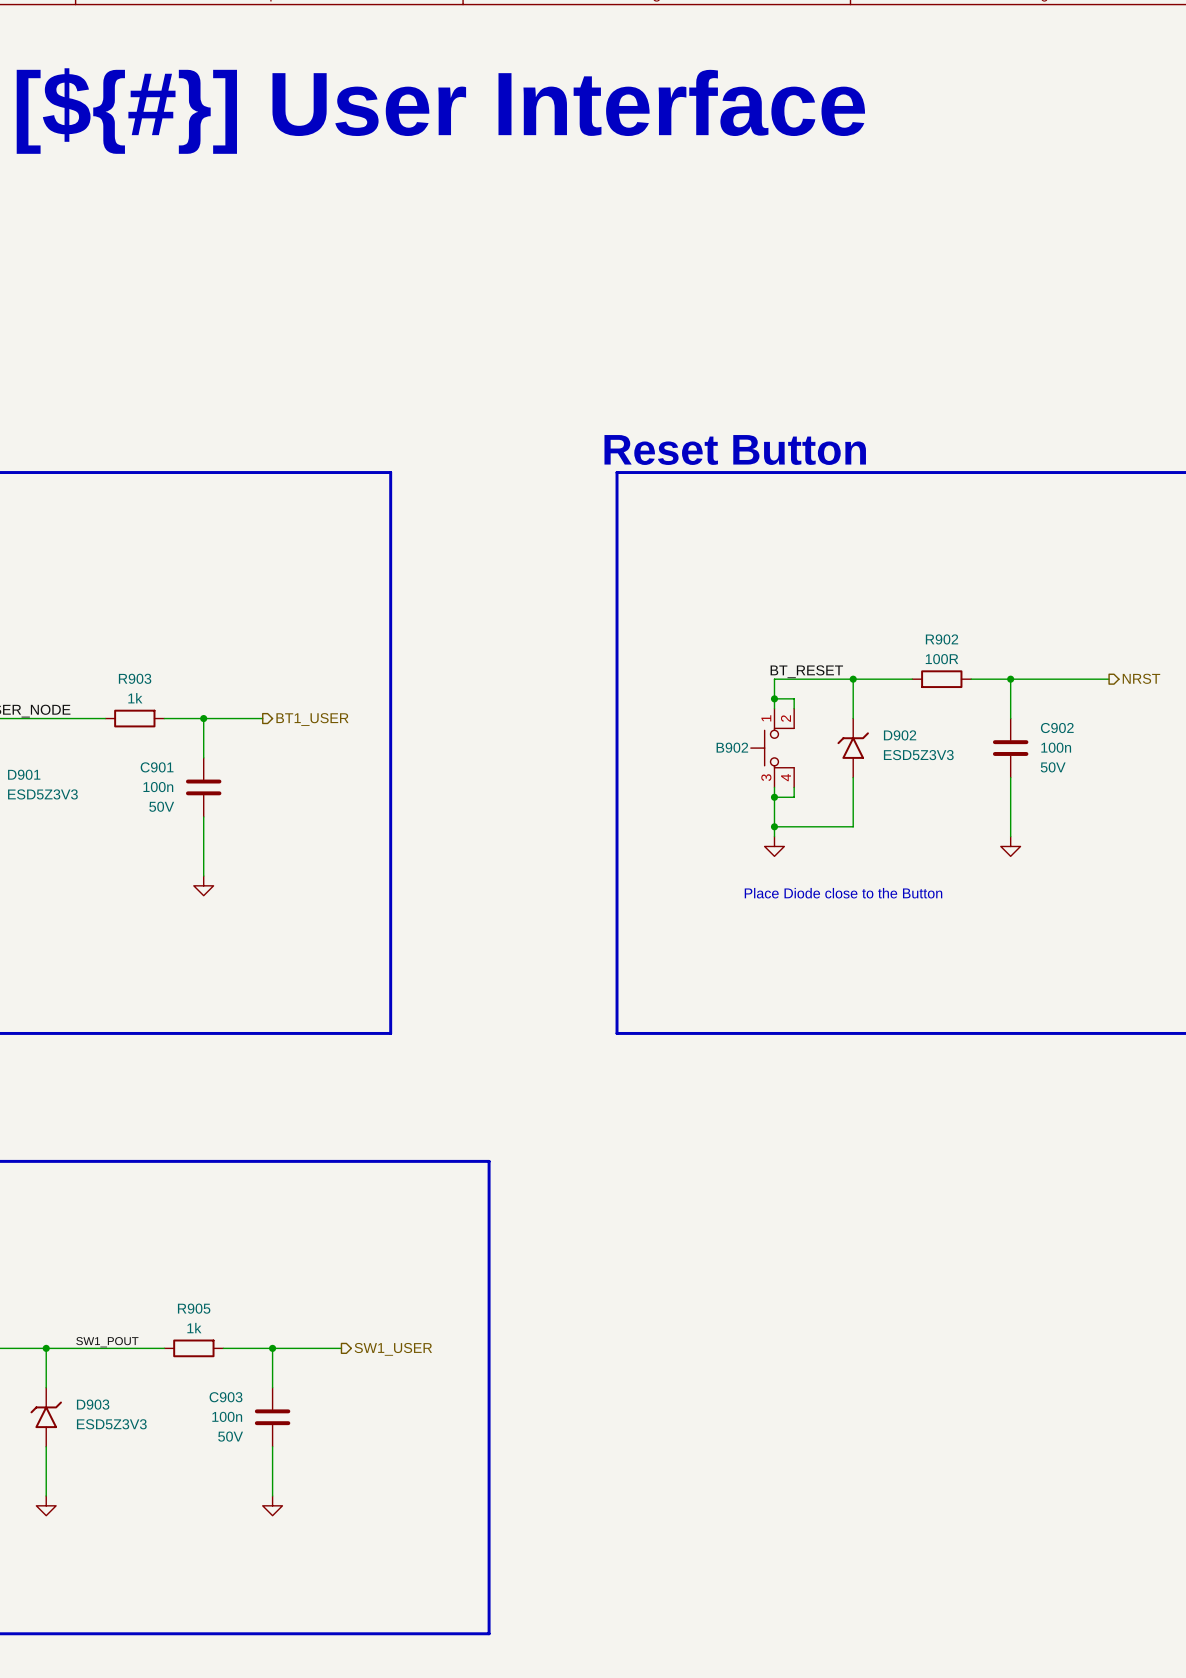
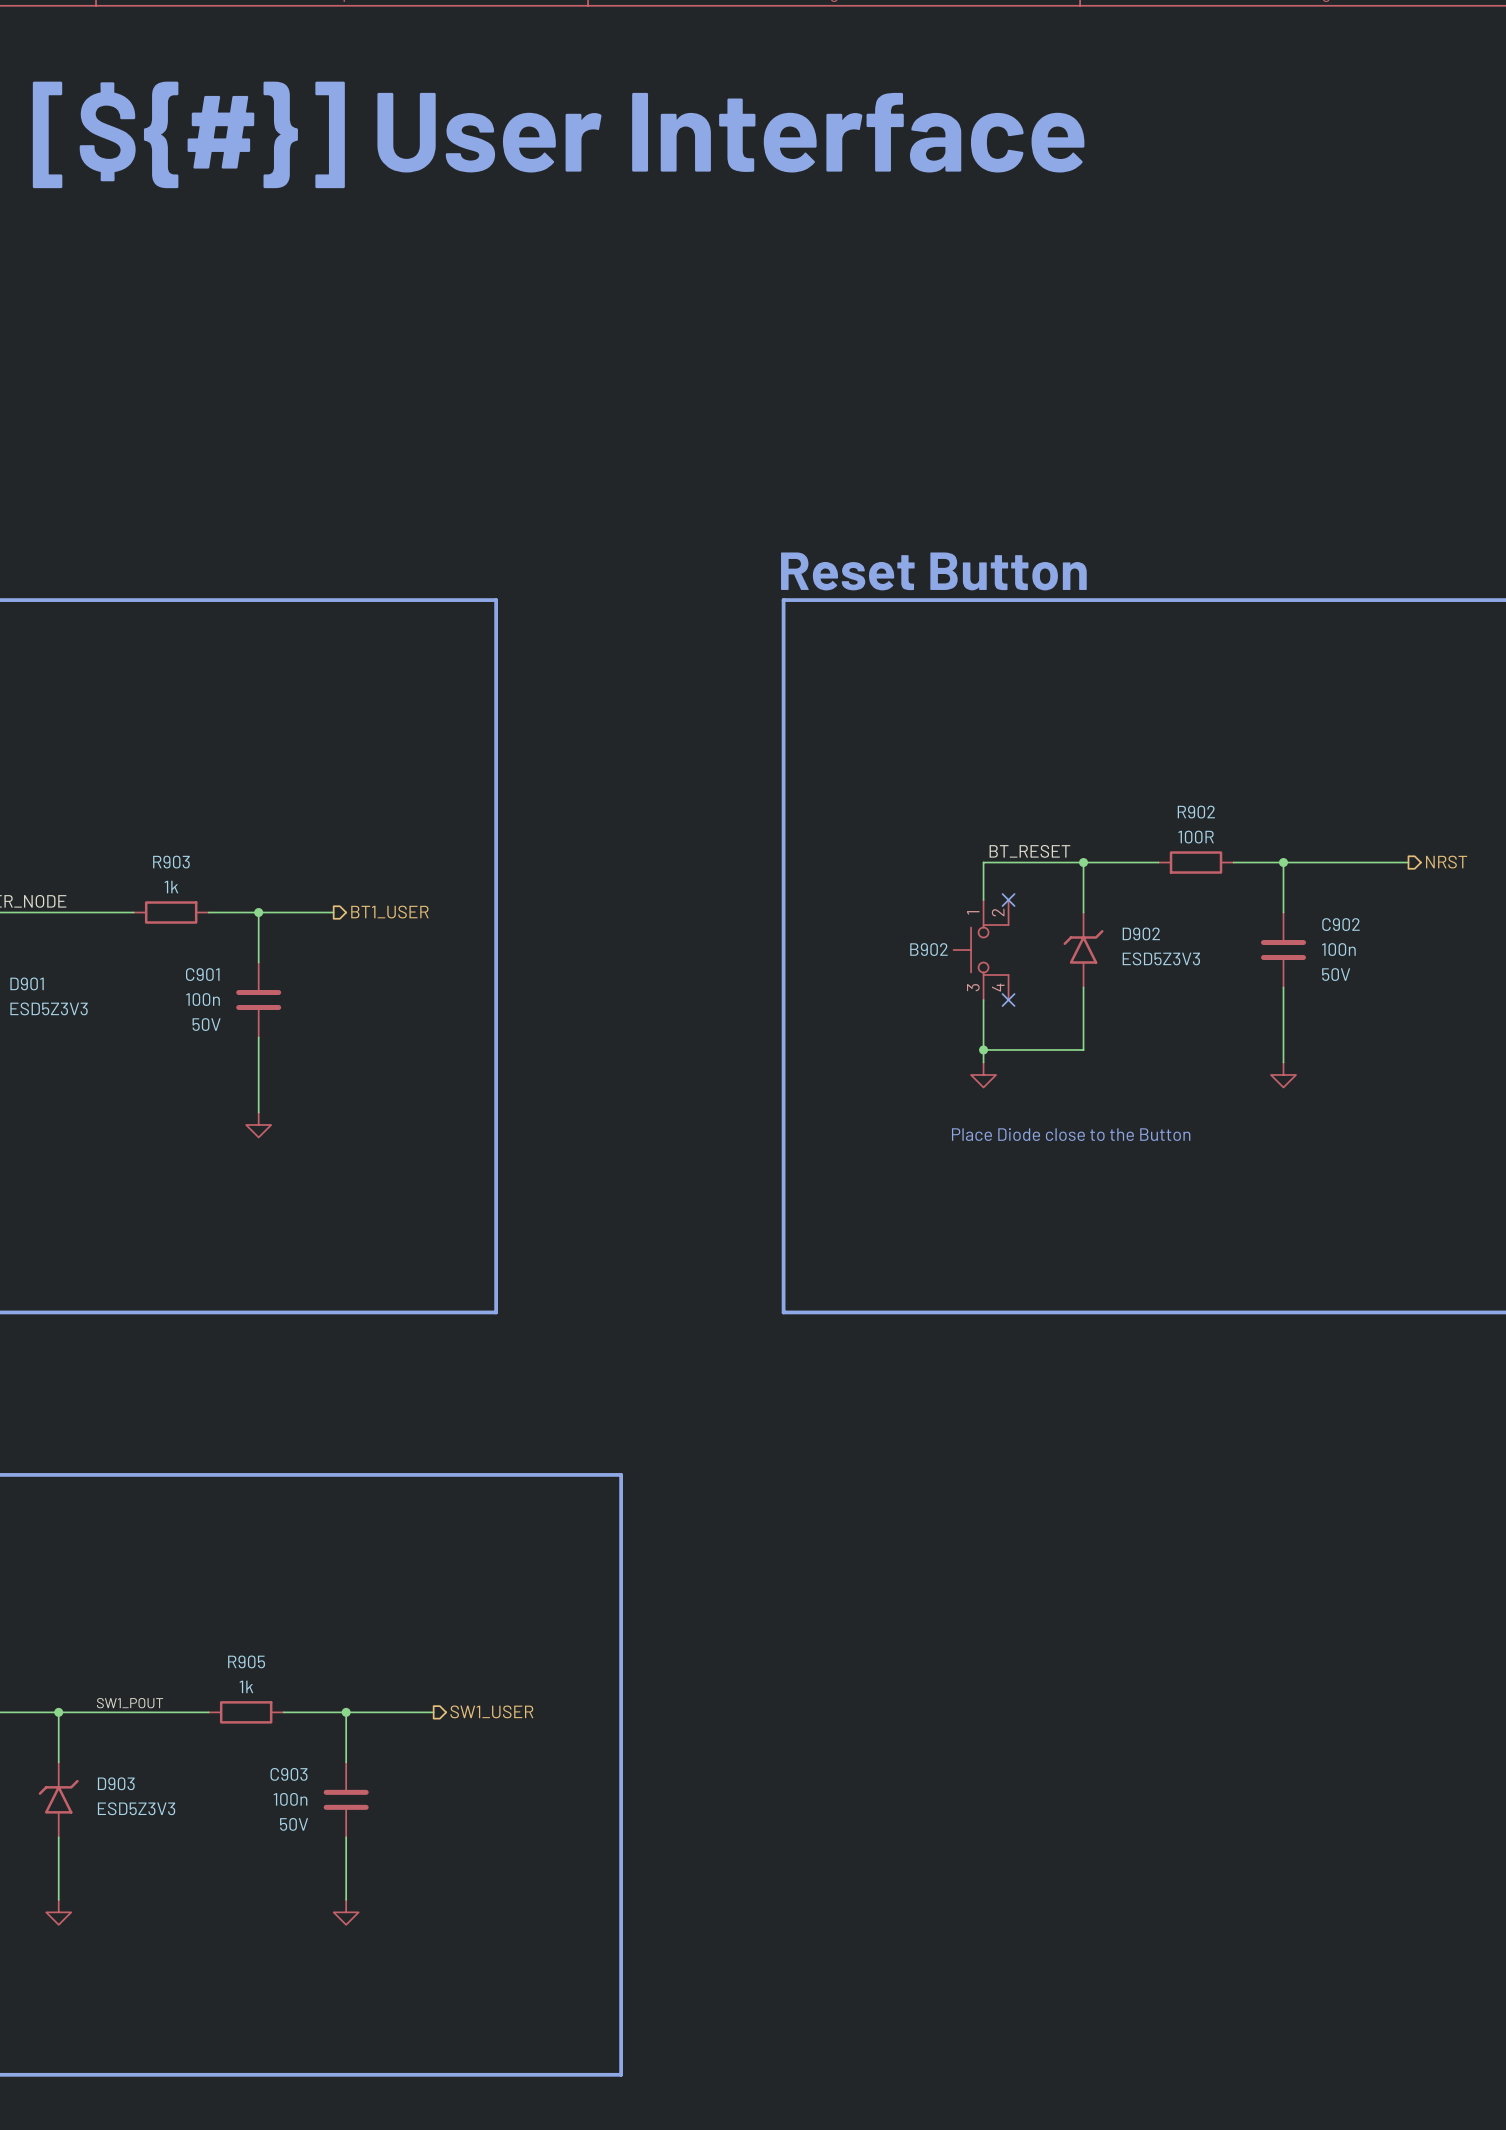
wire: (774, 698) (794, 698) (794, 708) -> none
junction: (774, 698) -> none
no-connect mark: none -> (1008, 900)
wire: (794, 787) (794, 797) (774, 797) -> none
no-connect mark: none -> (1008, 1000)
junction: (774, 797) -> none

